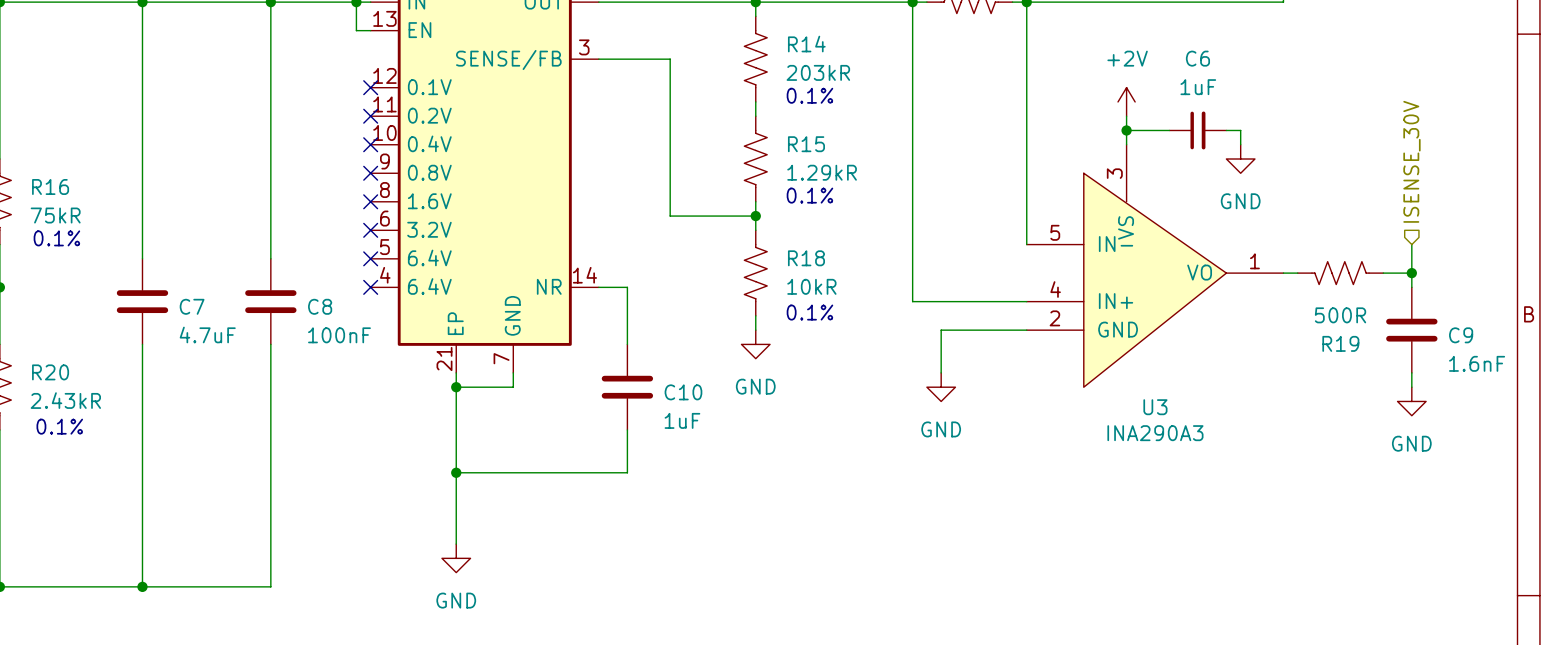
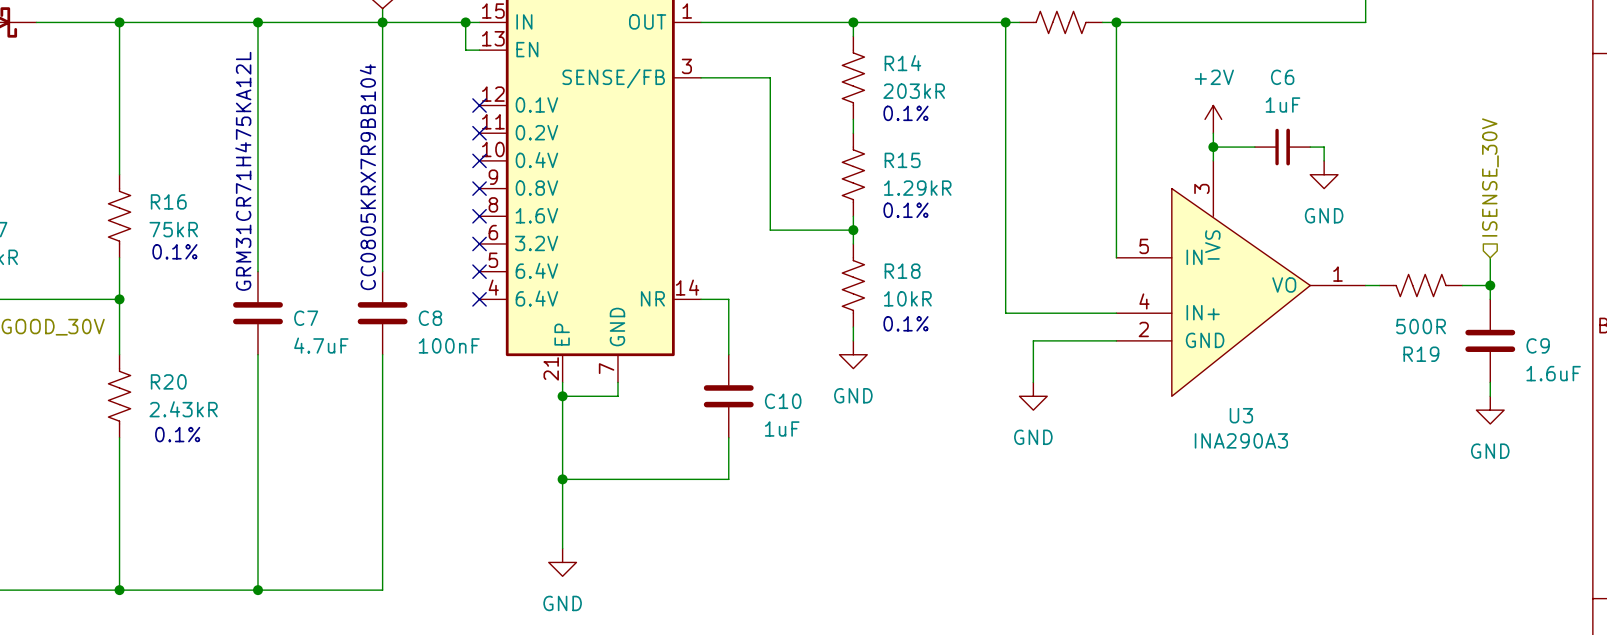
text: none -> GRM31CR71H475KA12L (243, 171)
text: none -> CC0805KRX7R9BB104 (367, 177)
C9 value: 1.6nF (1477, 363) -> 1.6uF (1553, 373)

